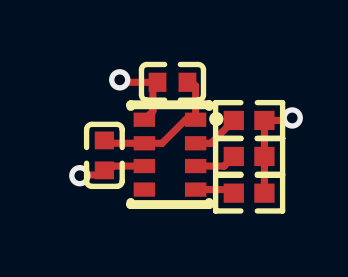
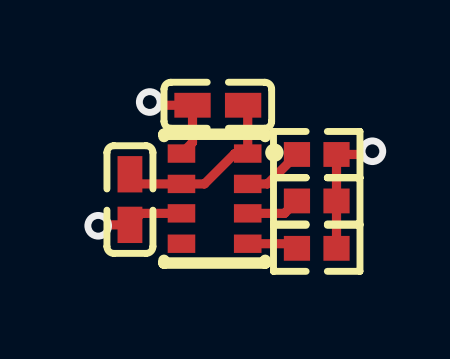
part footprint: [138, 61, 207, 103] -> [160, 78, 276, 132]
part footprint: [83, 121, 125, 190] -> [103, 142, 157, 257]

